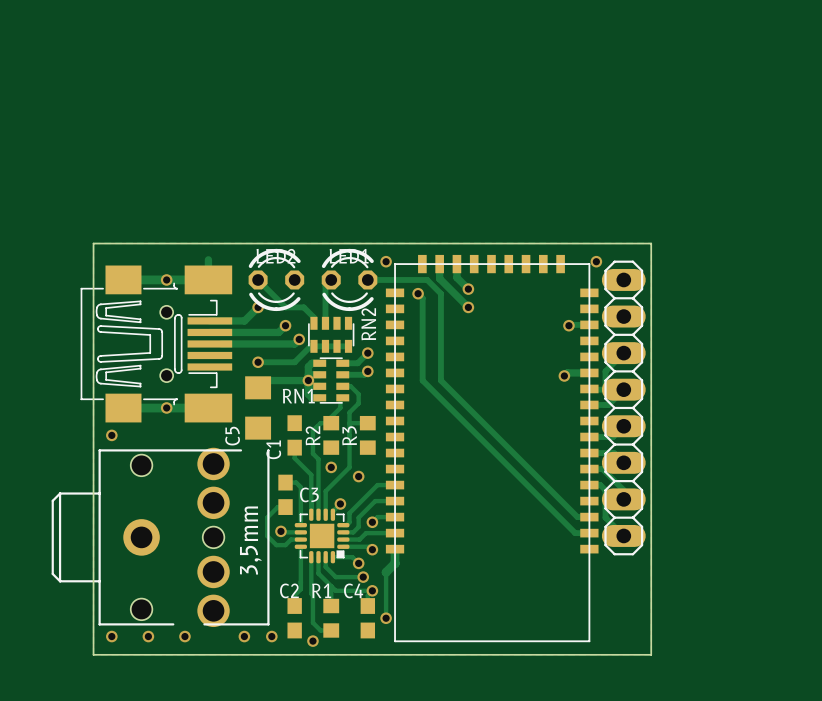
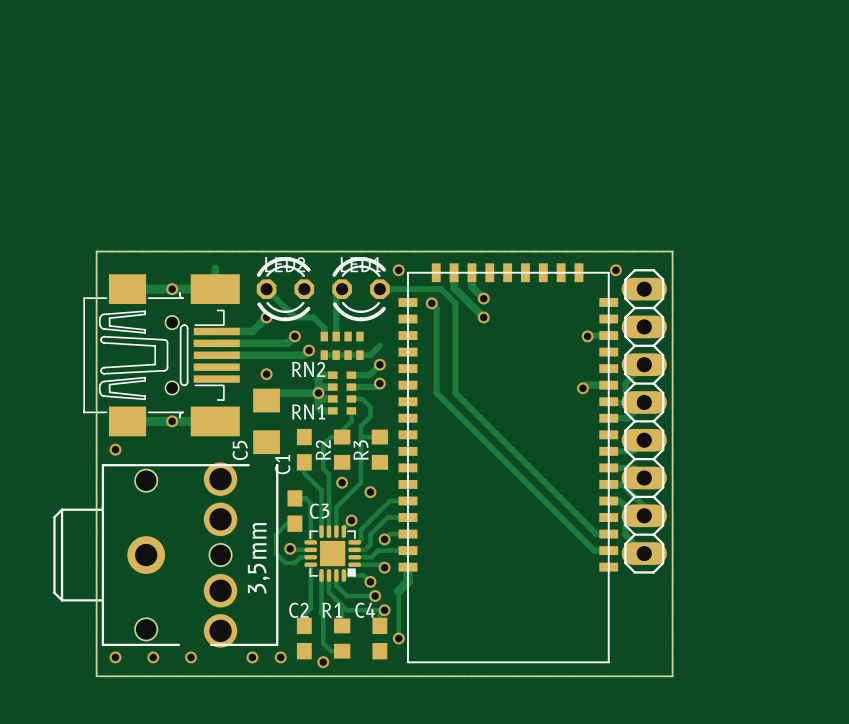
RN2 footprint: [308, 316, 355, 353] -> [320, 331, 364, 360]
RN2 name position: RN2 (368, 324) -> RN2 (308, 369)
track: none -> (379, 345) (370, 355) (324, 355)
track: (348, 346) (310, 346) (294, 362) (258, 362) -> none
RN1 footprint: [313, 357, 350, 404] -> [327, 371, 357, 415]

